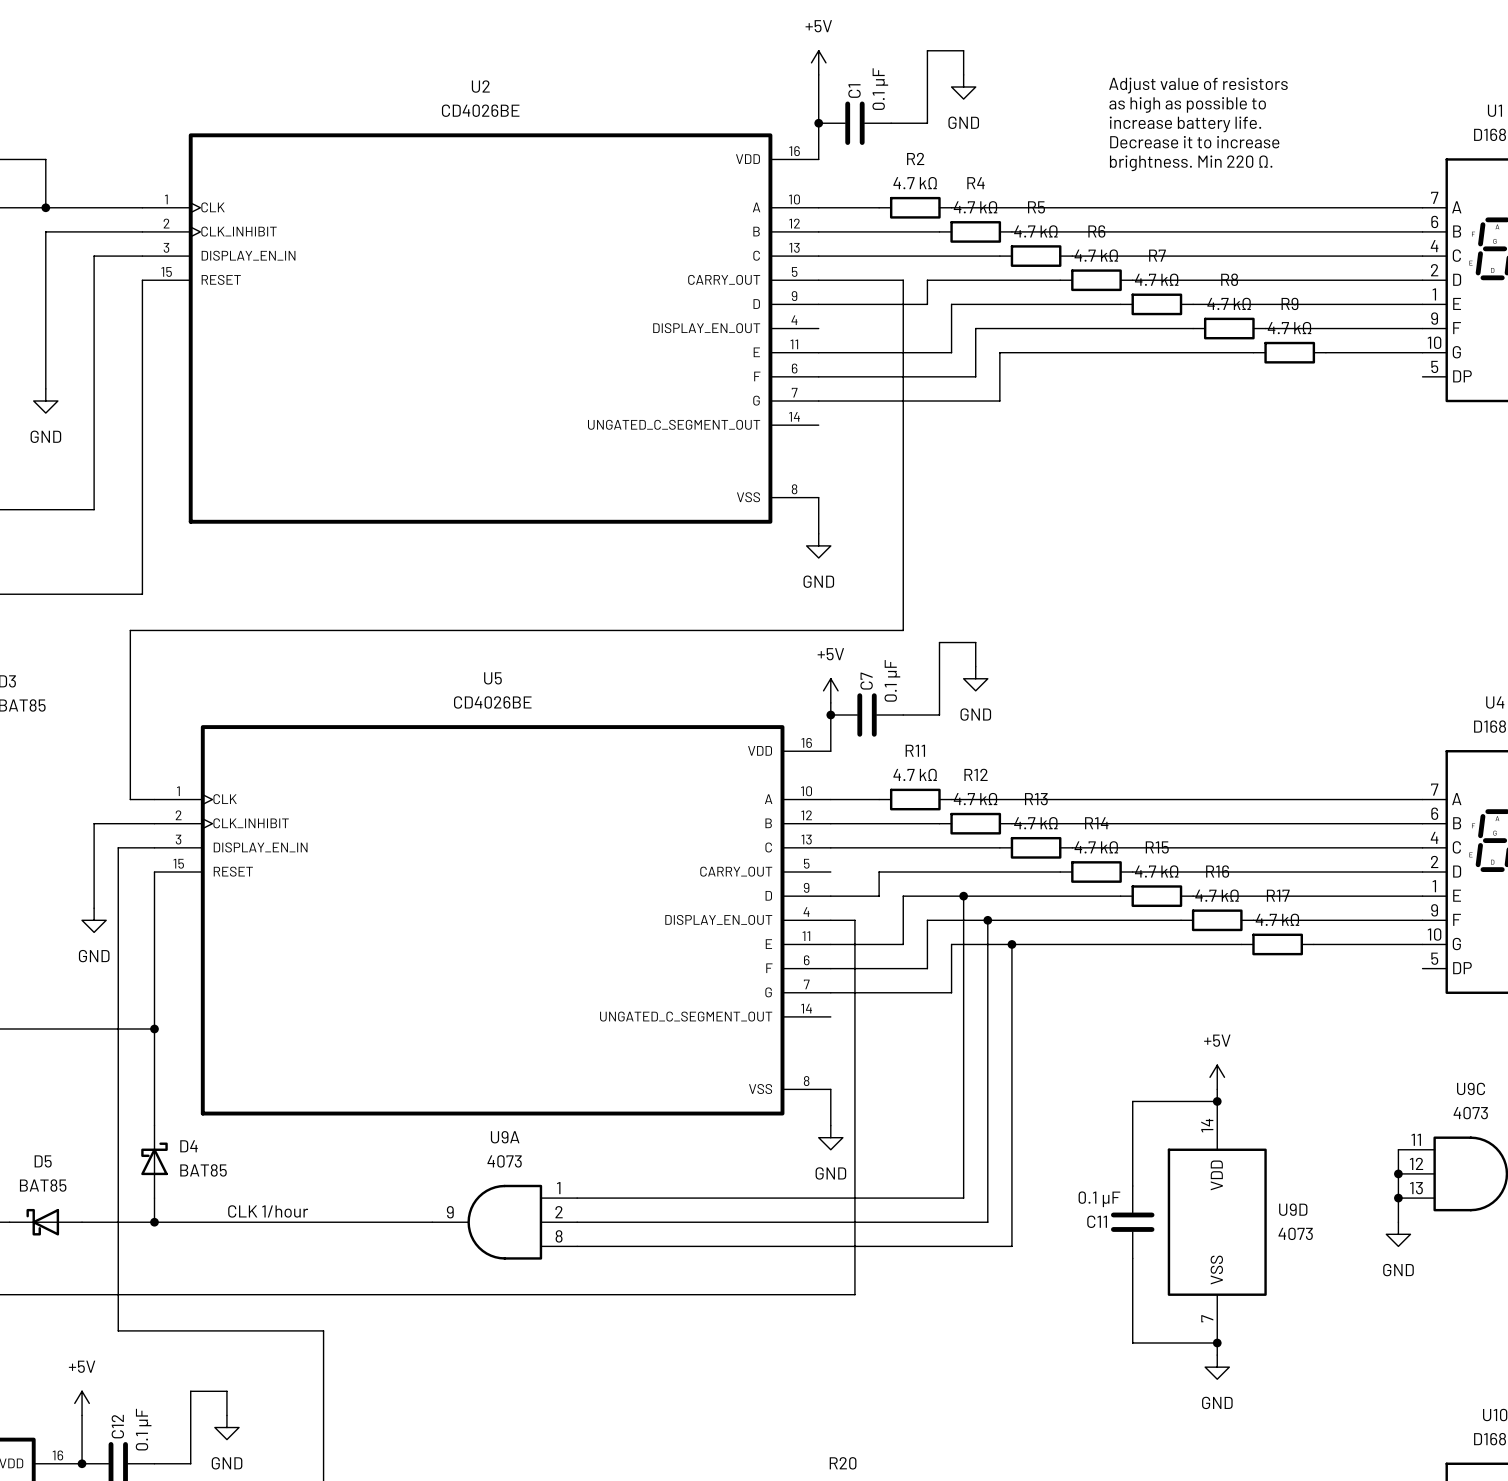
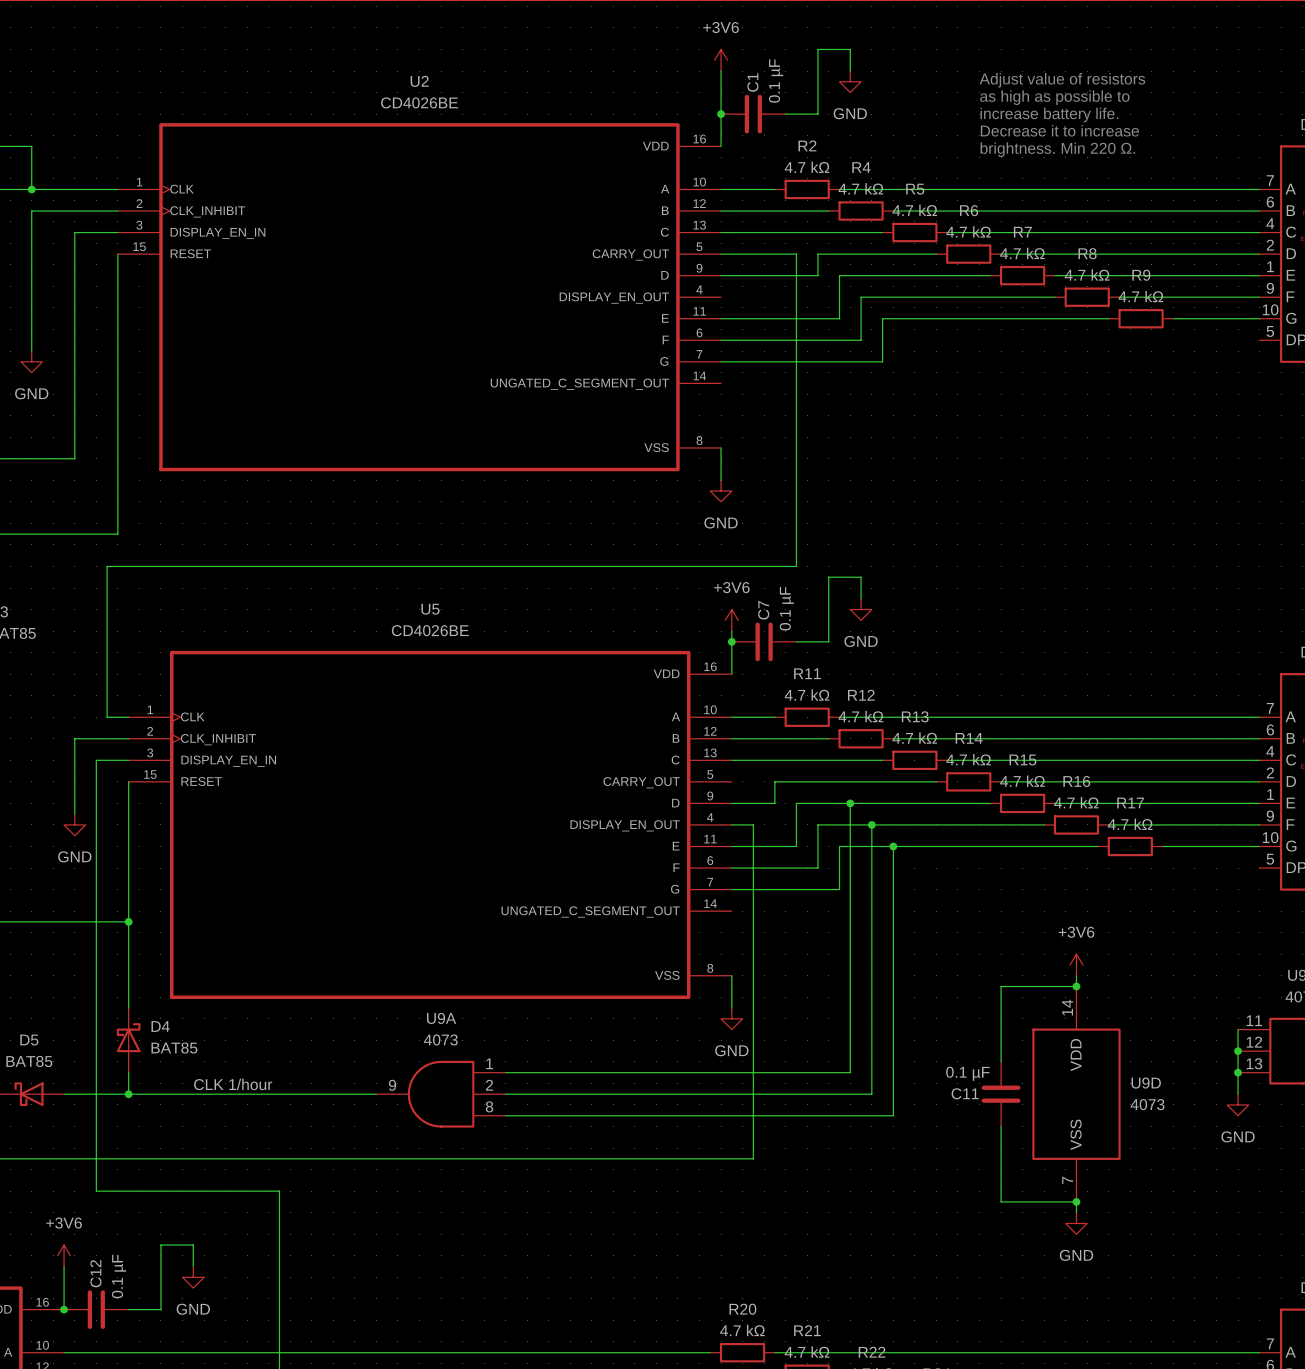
power symbol: +5V (818, 62) -> +3V6 (721, 60)
power symbol: +5V (830, 690) -> +3V6 (731, 620)
power symbol: +5V (1217, 1077) -> +3V6 (1076, 964)
power symbol: +5V (82, 1403) -> +3V6 (64, 1255)

